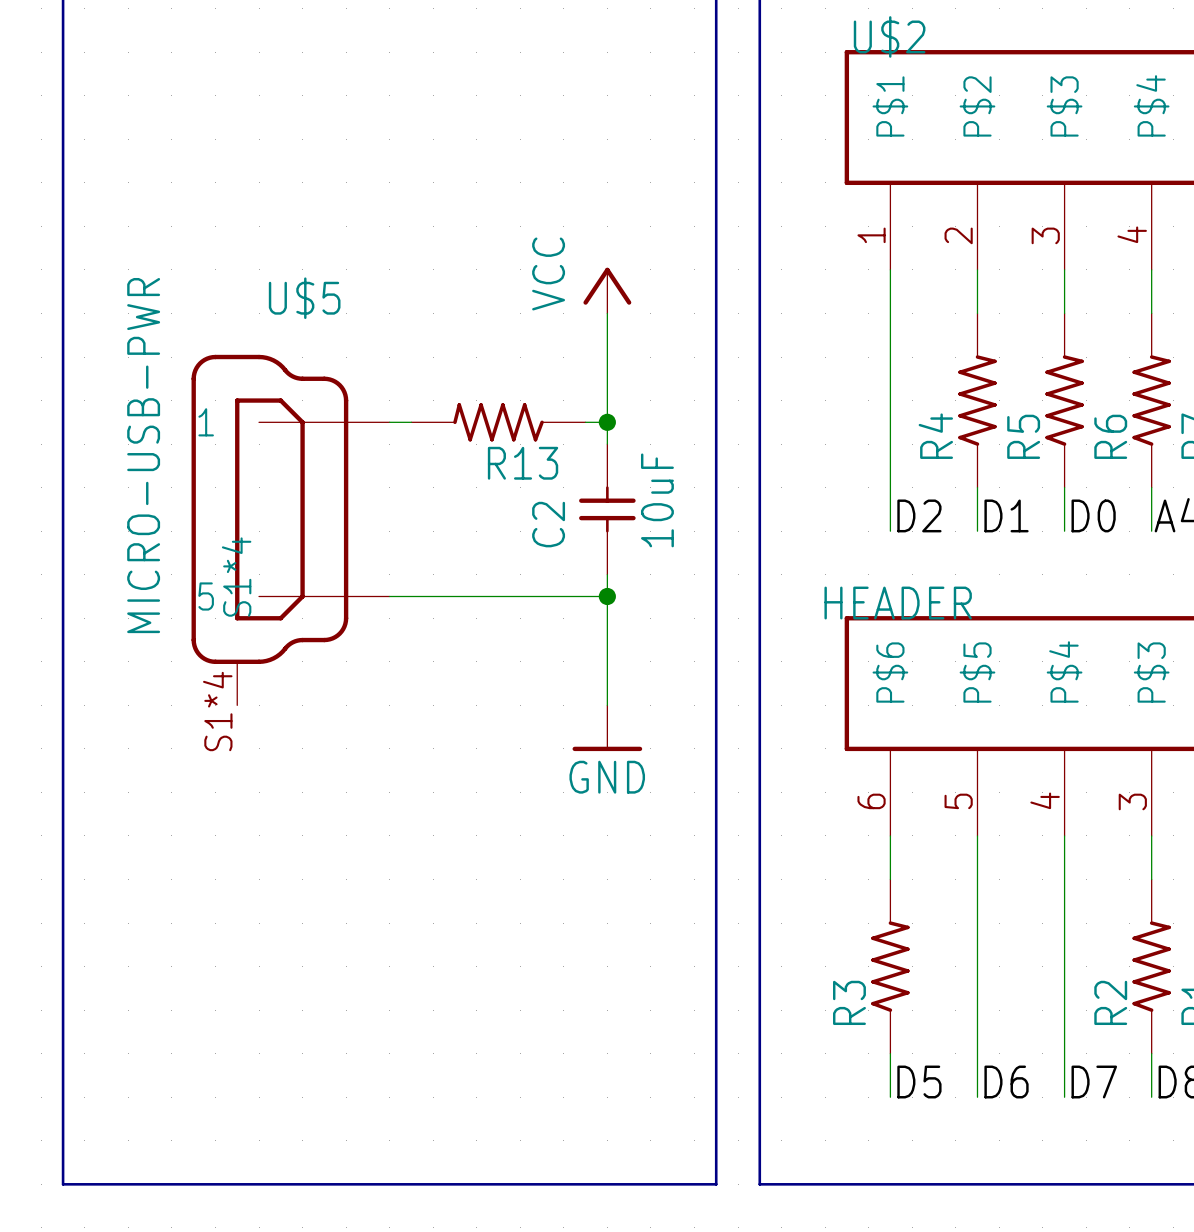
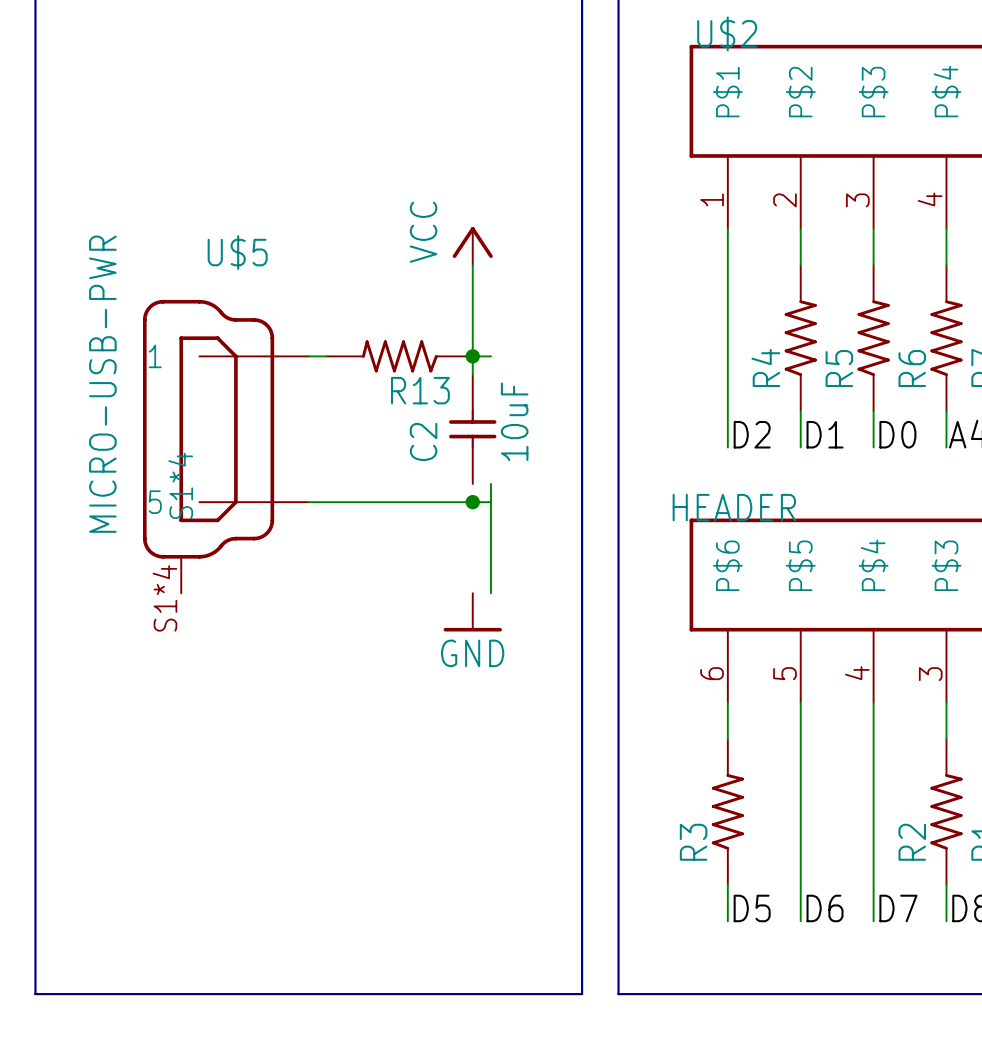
power symbol position: VCC (607, 290) -> VCC (472, 246)
wire: (607, 313) (607, 444) -> (472, 265) (472, 374)
junction position: (607, 422) -> (472, 356)
C2 position: (607, 509) -> (472, 429)
junction position: (607, 596) -> (472, 502)
power symbol position: GND (607, 728) -> GND (472, 612)

